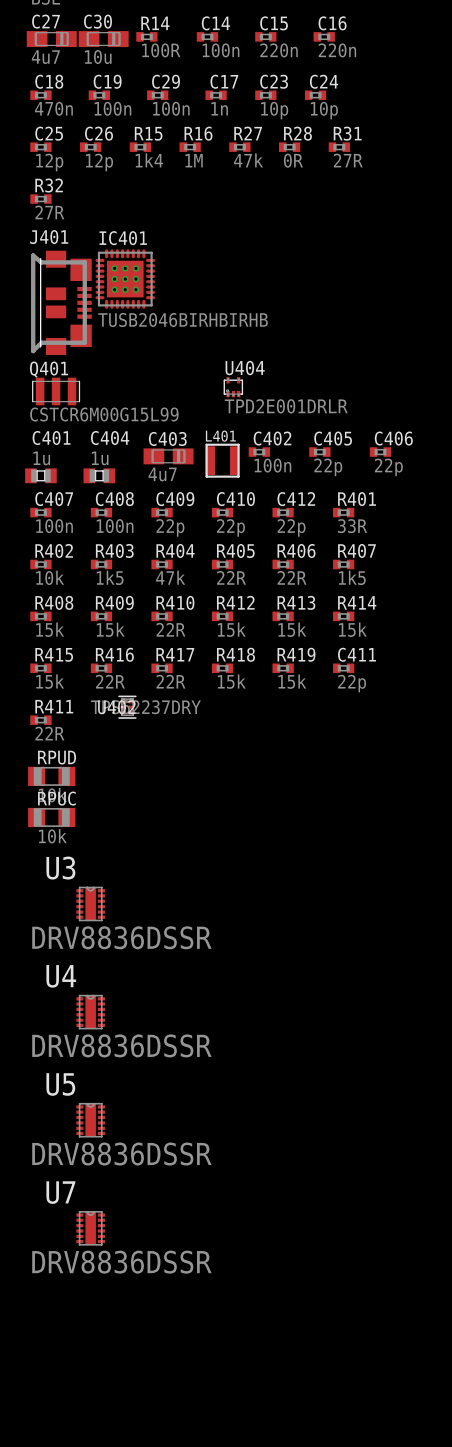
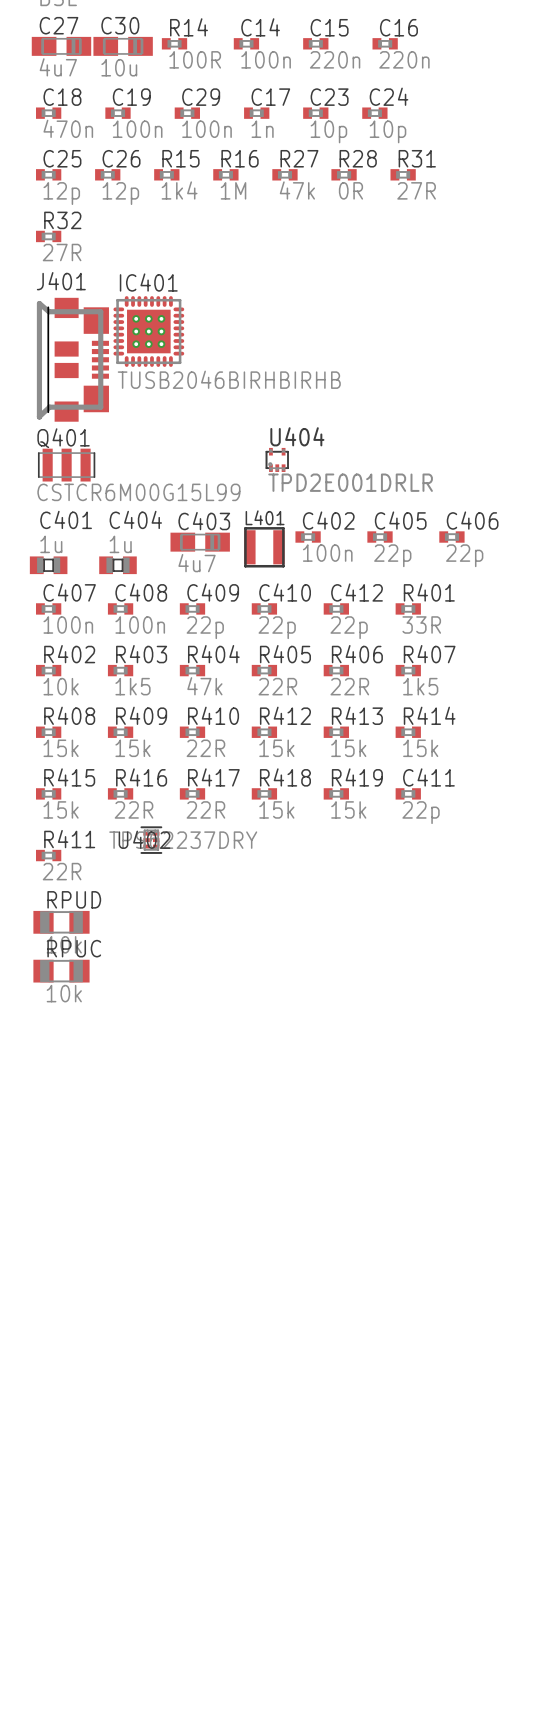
U3: DRV8836DSSR (90, 903) -> none
U4: DRV8836DSSR (90, 1012) -> none
U5: DRV8836DSSR (90, 1120) -> none
U7: DRV8836DSSR (90, 1228) -> none

